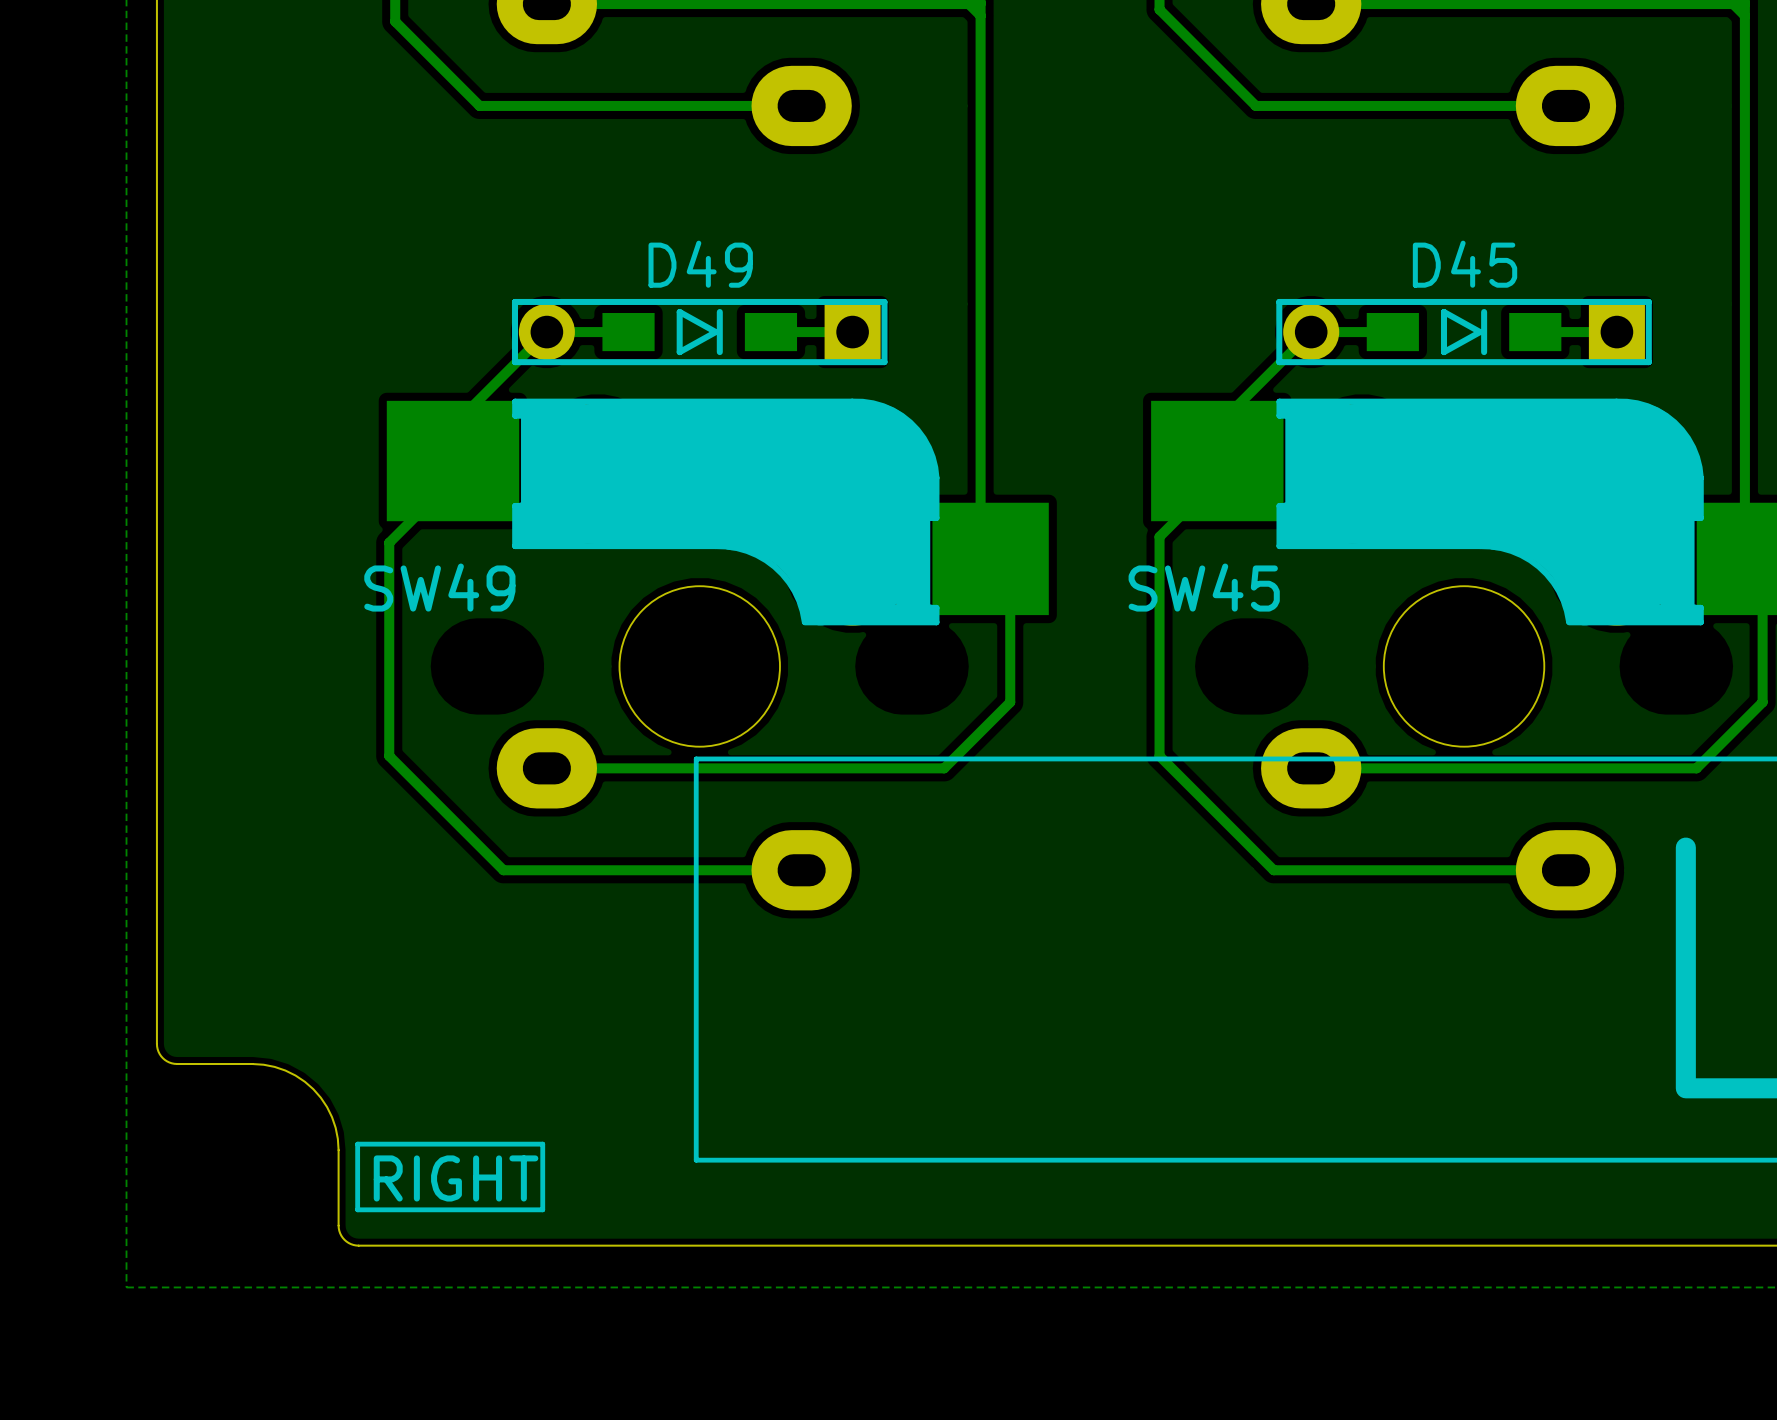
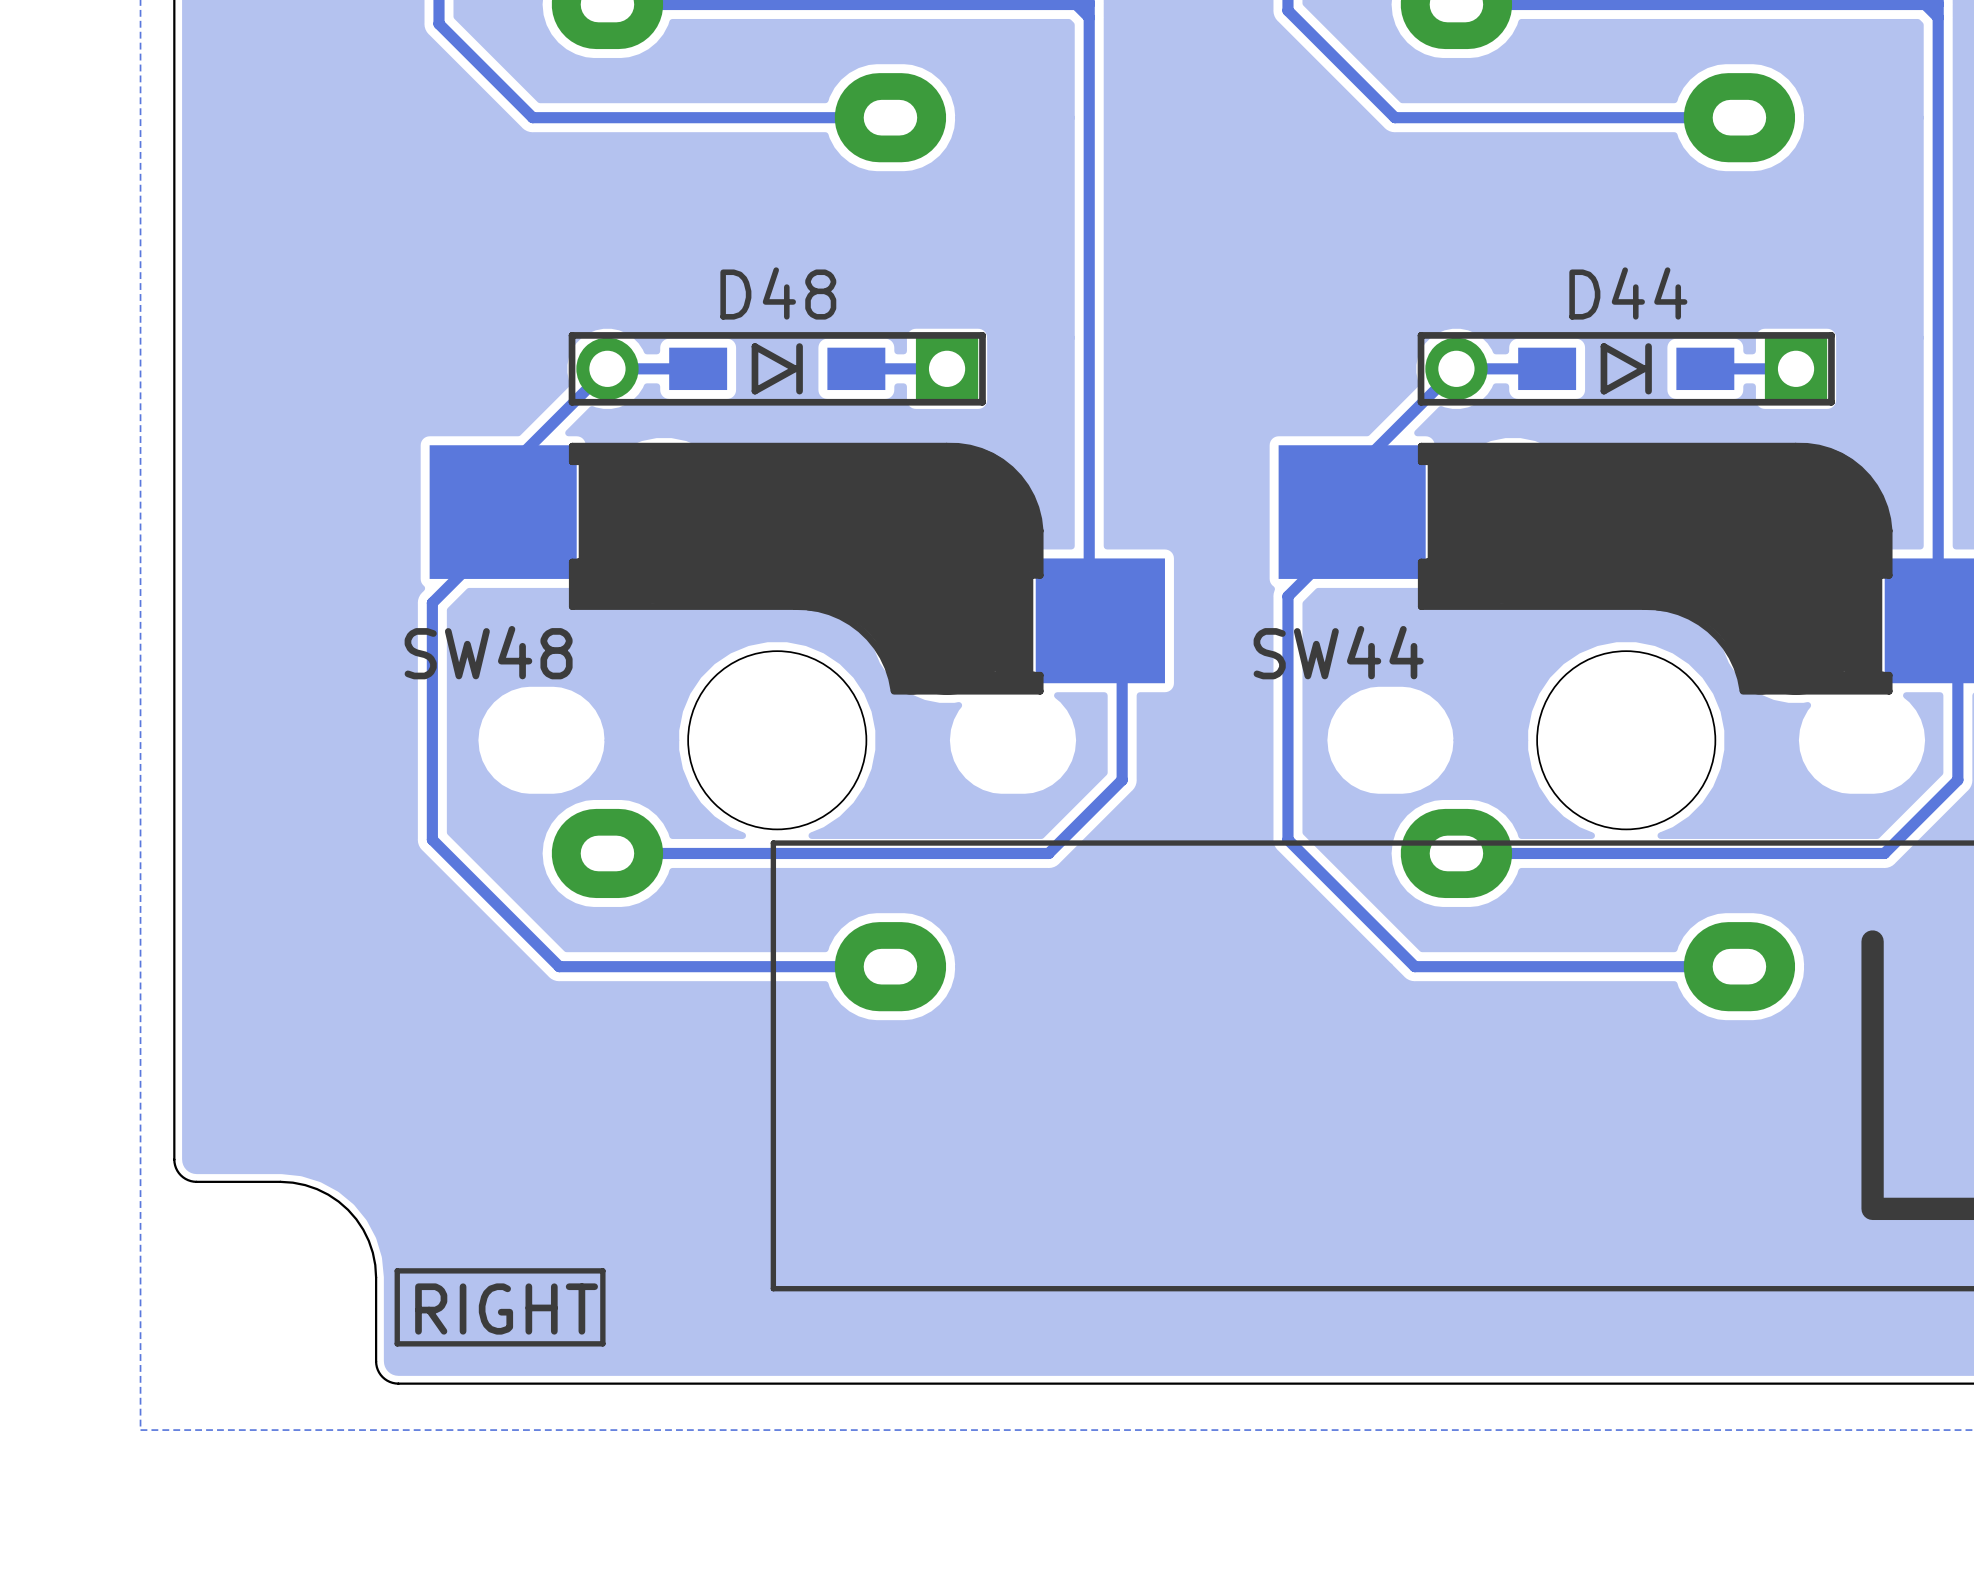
D49 name: D49 (700, 264) -> D48 (778, 293)
D45 name: D45 (1465, 264) -> D44 (1628, 293)
SW49 name: SW49 (439, 587) -> SW48 (488, 652)
SW45 name: SW45 (1204, 587) -> SW44 (1338, 652)

